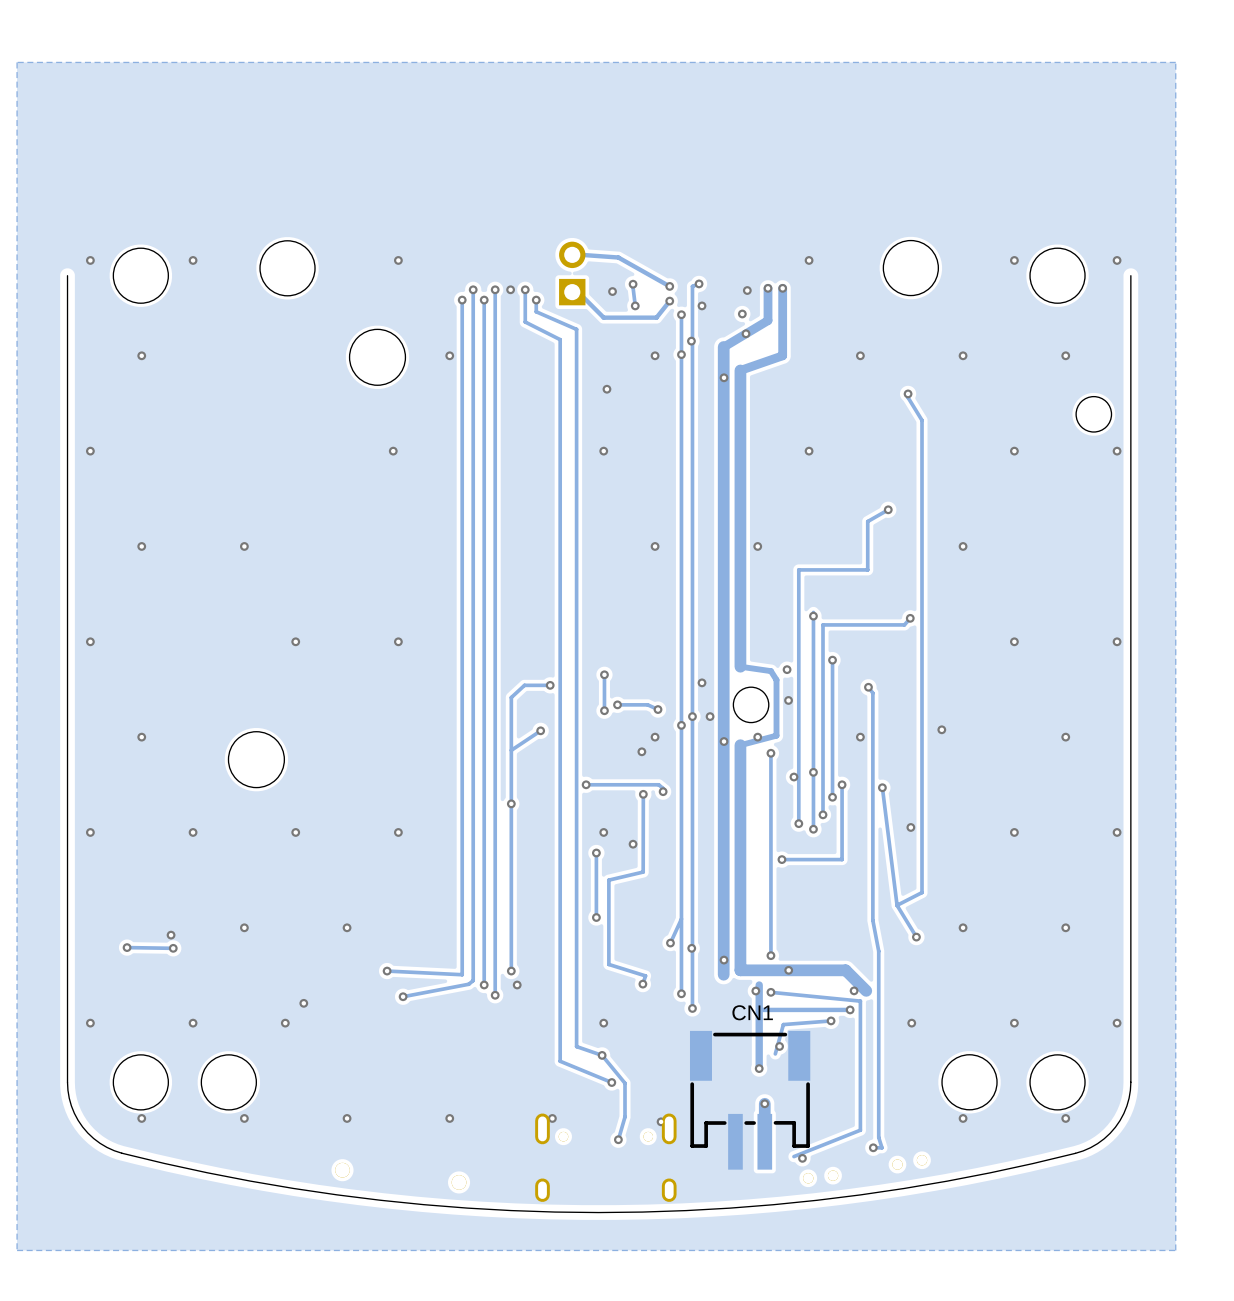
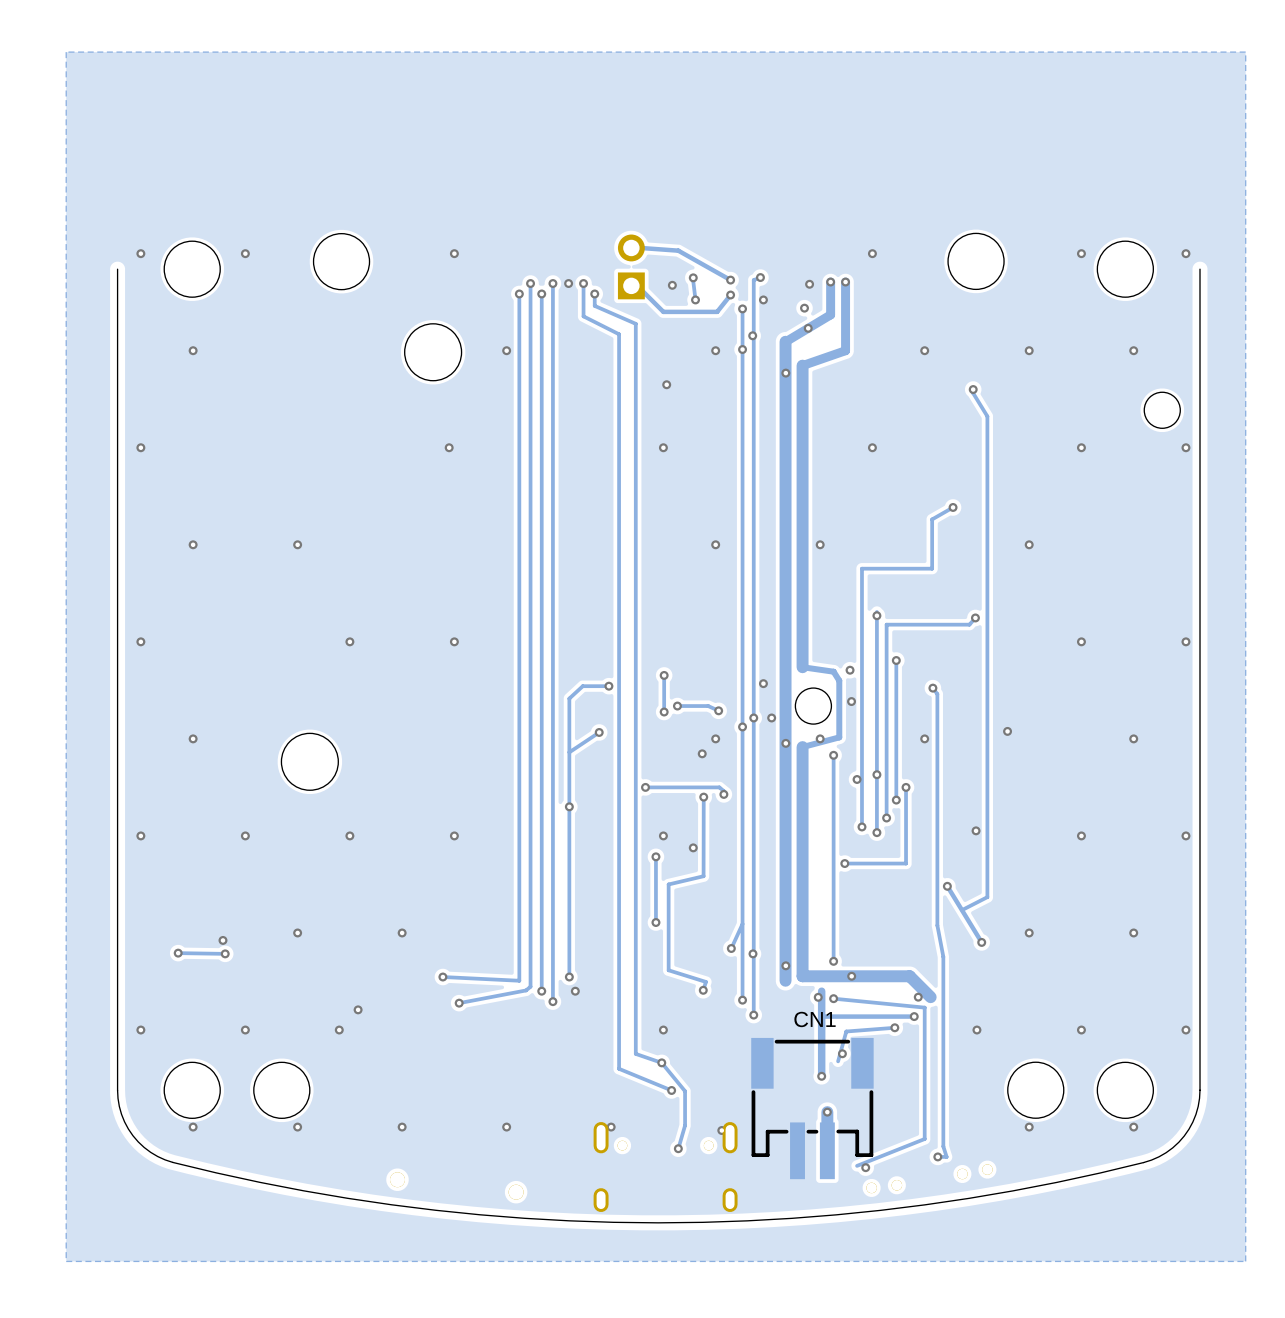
track: (882, 787) (897, 905) (916, 937) -> (947, 886) (981, 942)
via: (882, 787) -> none
via: none -> (947, 886)

